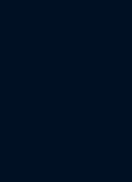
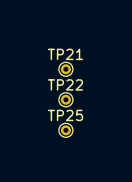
TP21: none -> (65, 69)
TP22: none -> (65, 99)
TP25: none -> (65, 130)

